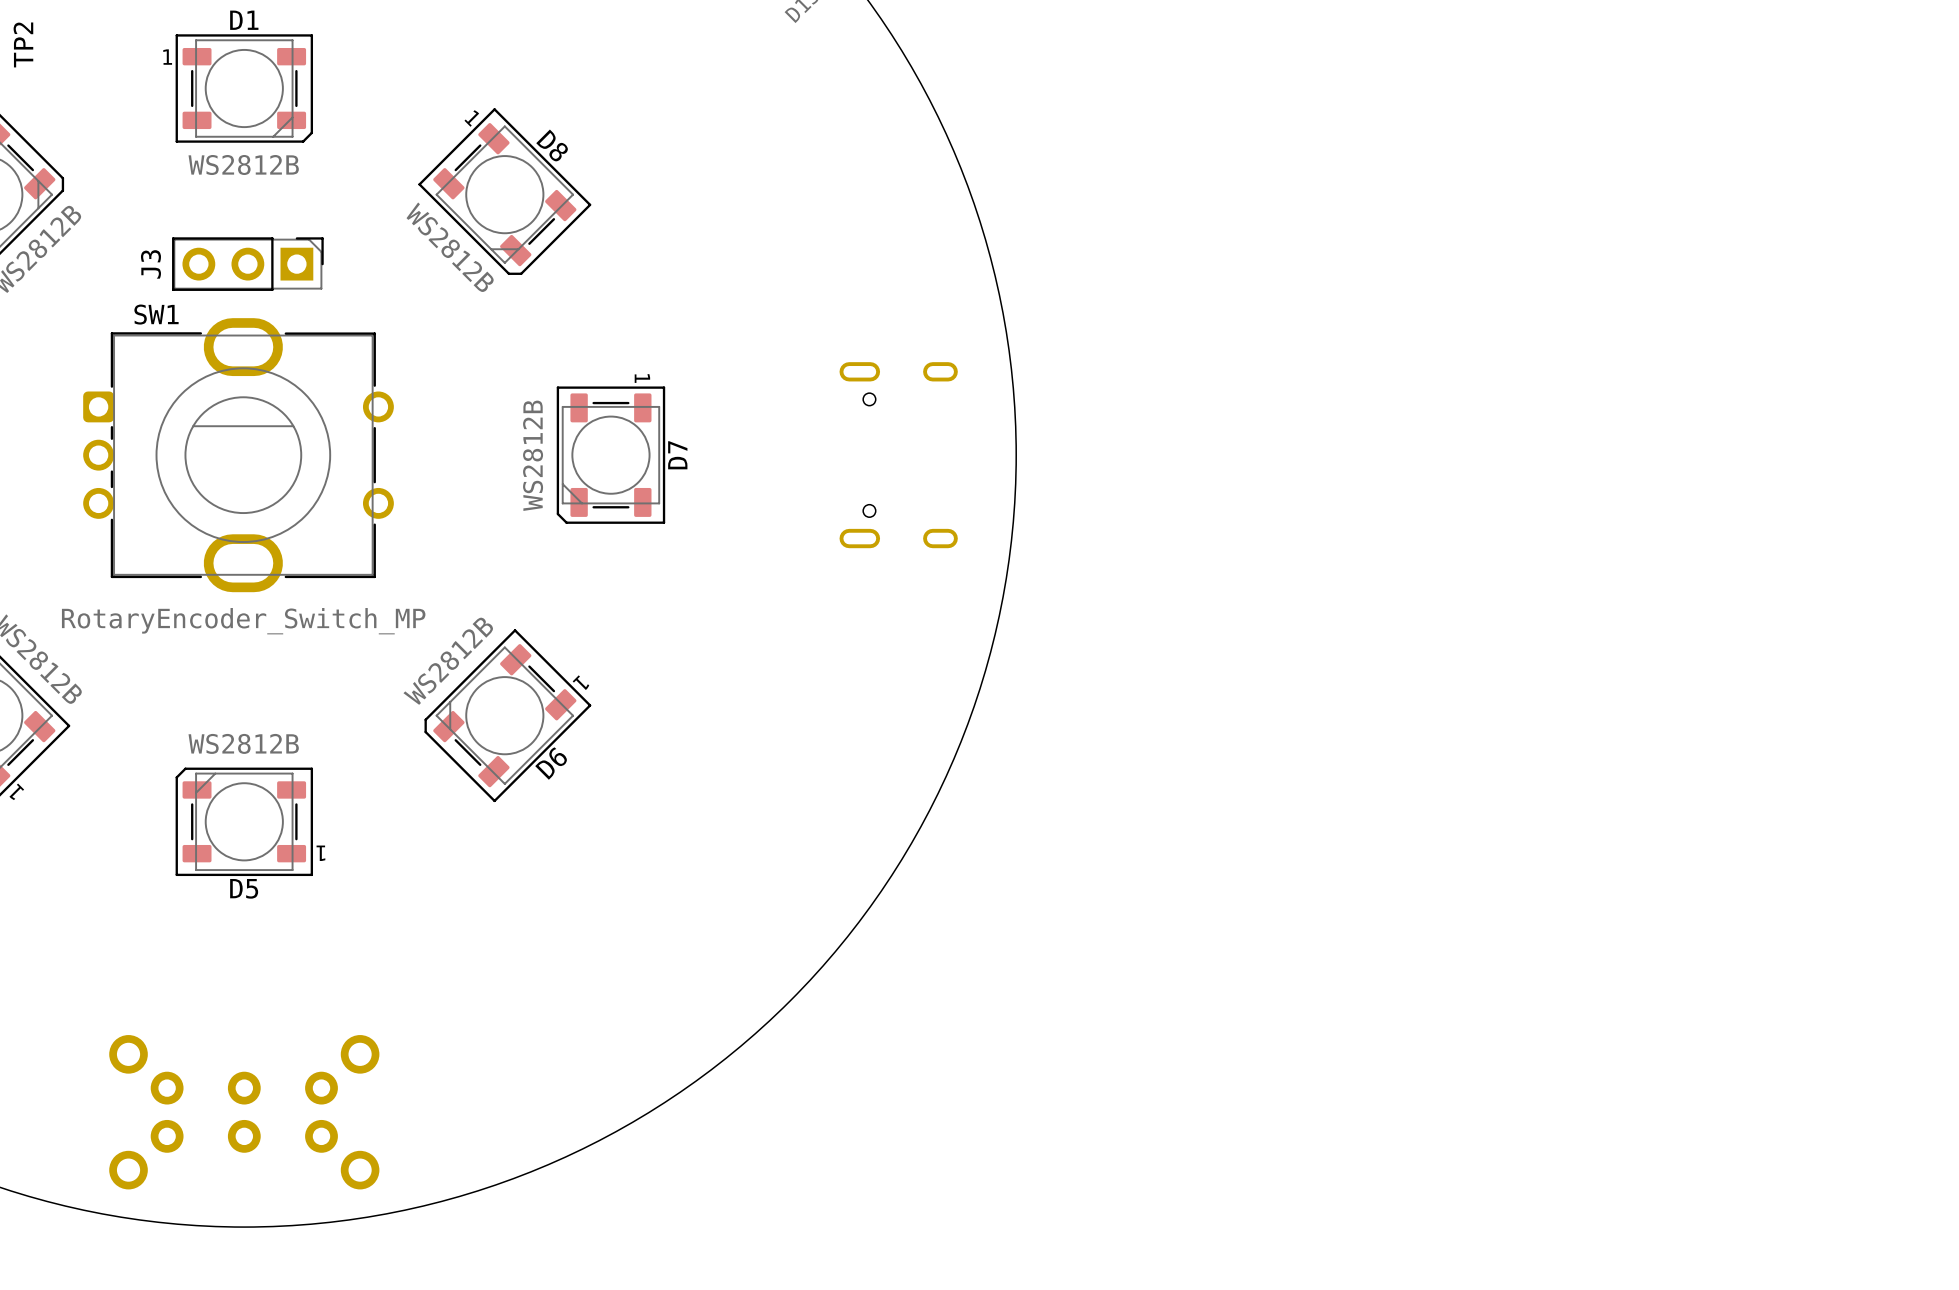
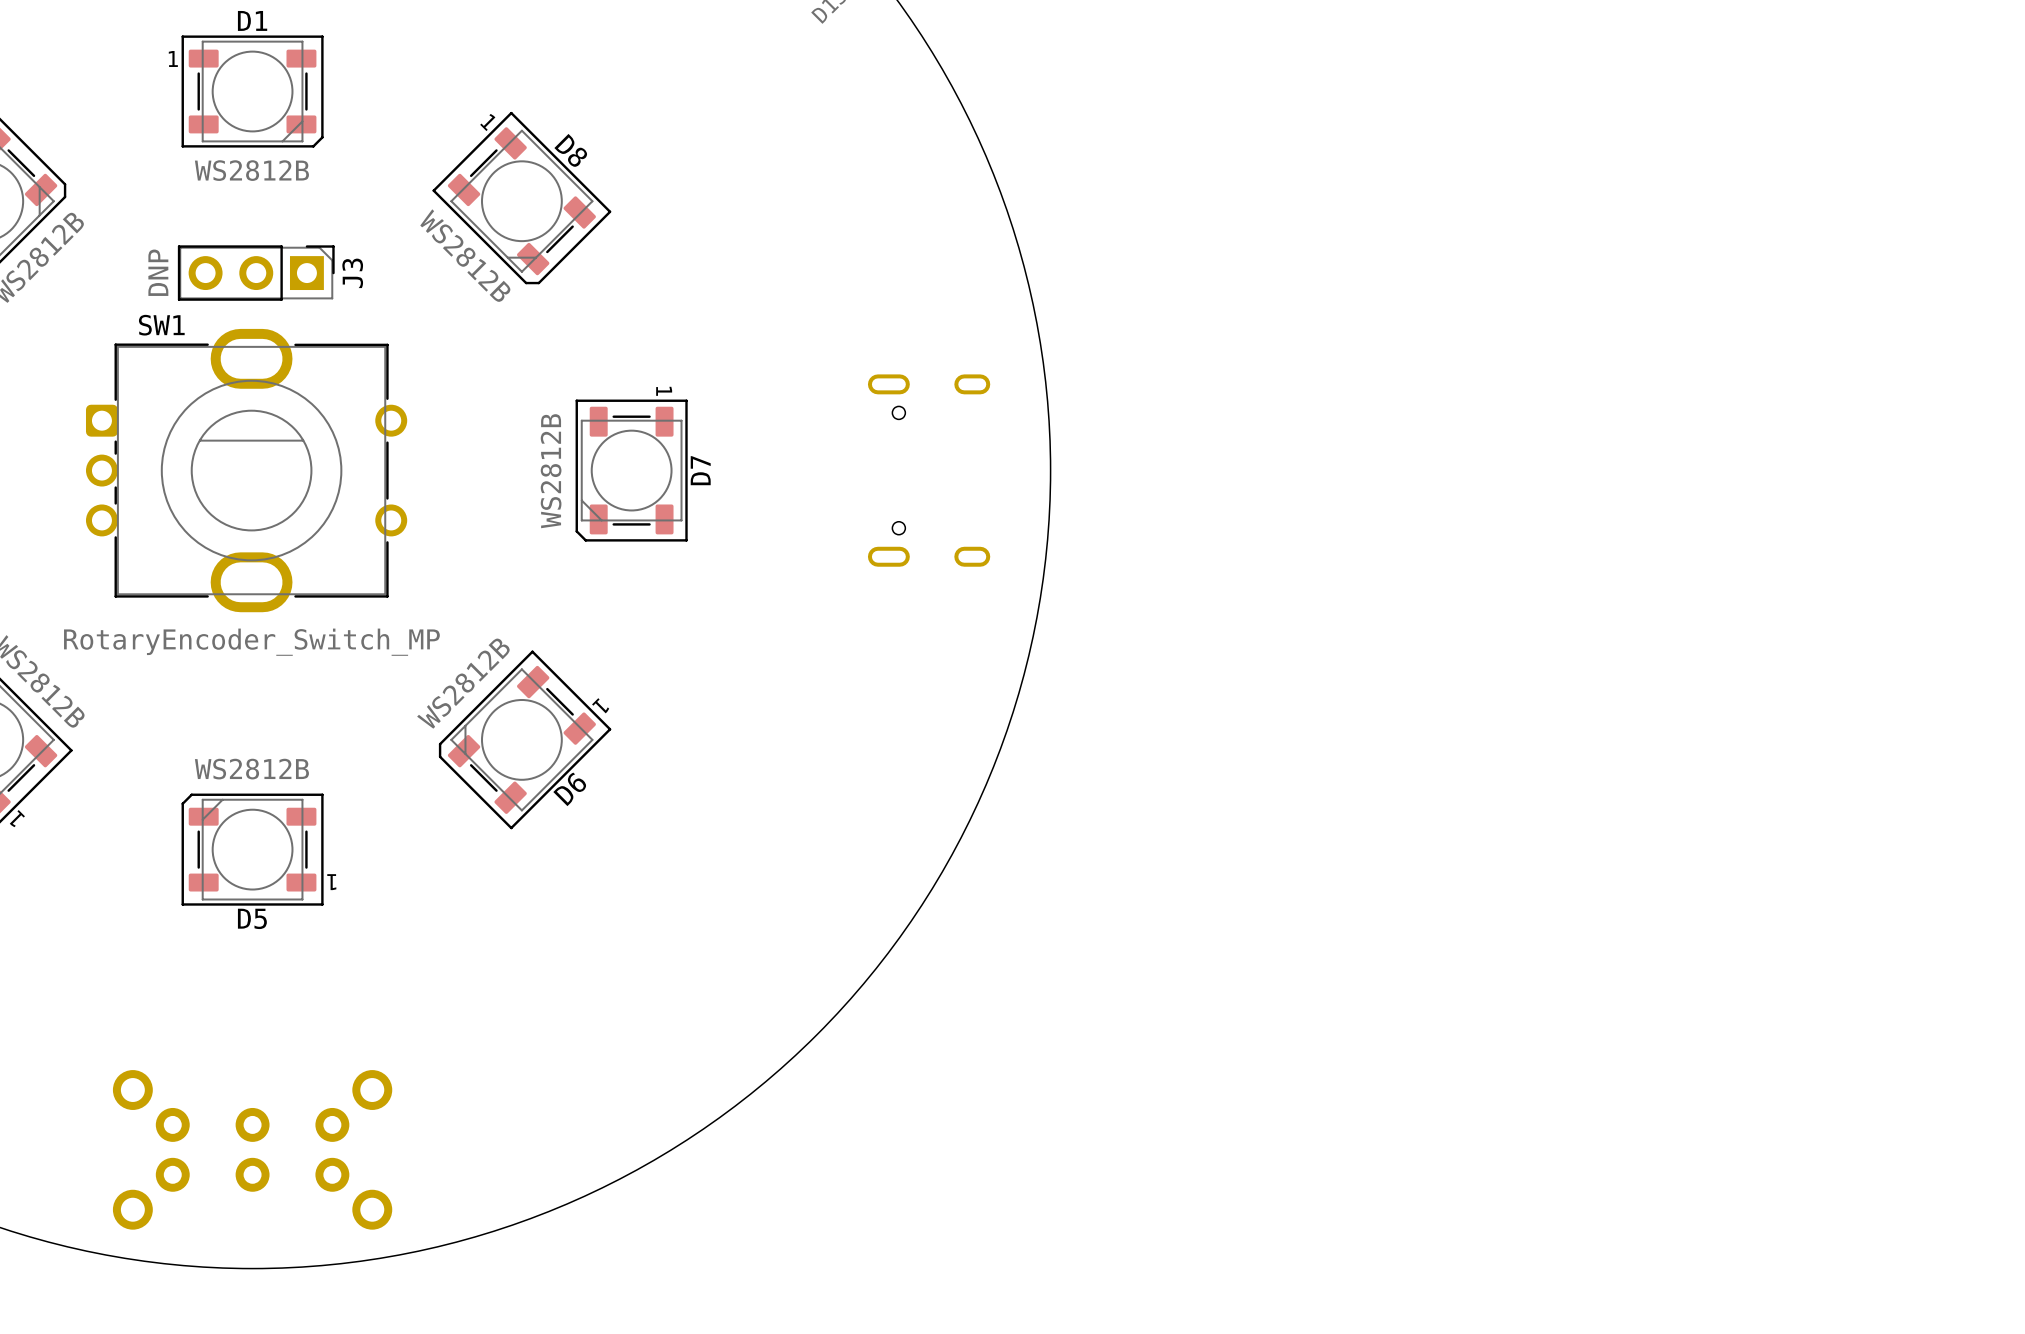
TP2 name: TP2 (23, 44) -> none
J3 value: none -> DNP (158, 272)
J3 name position: J3 (150, 264) -> J3 (352, 273)

